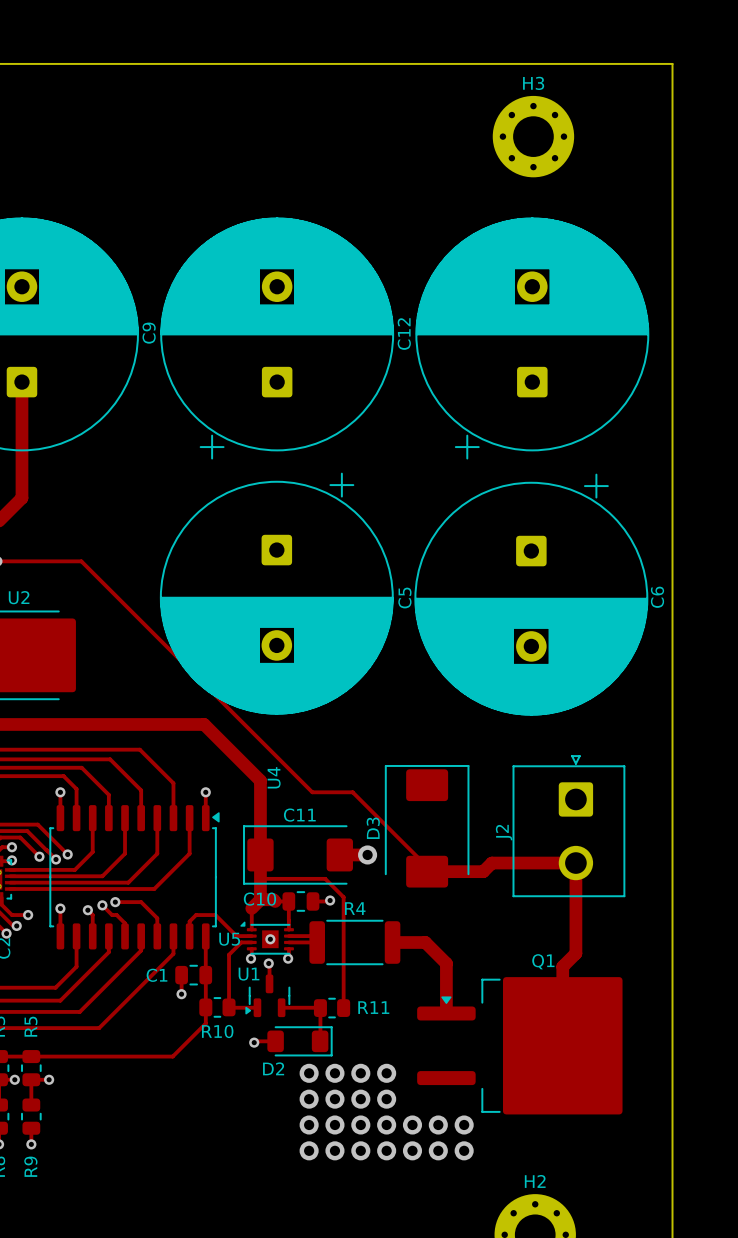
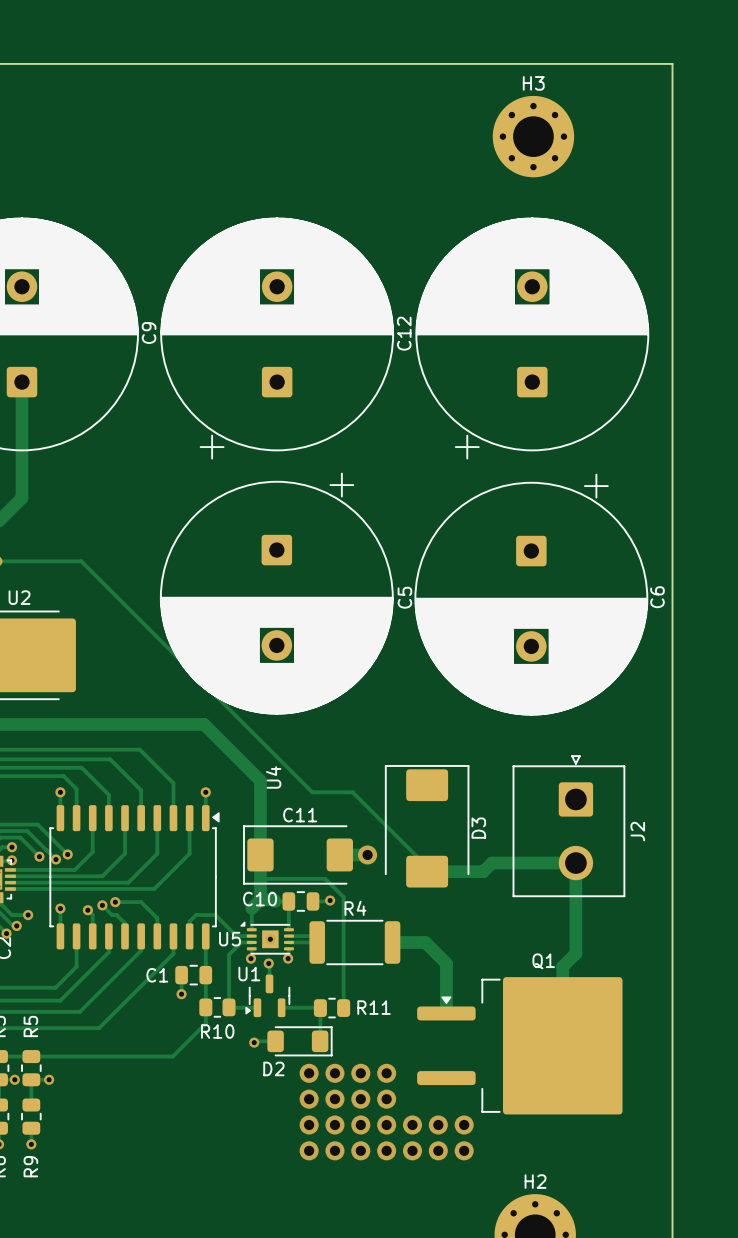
D3 name position: D3 (373, 828) -> D3 (478, 828)
J2 name position: J2 (504, 832) -> J2 (637, 831)

